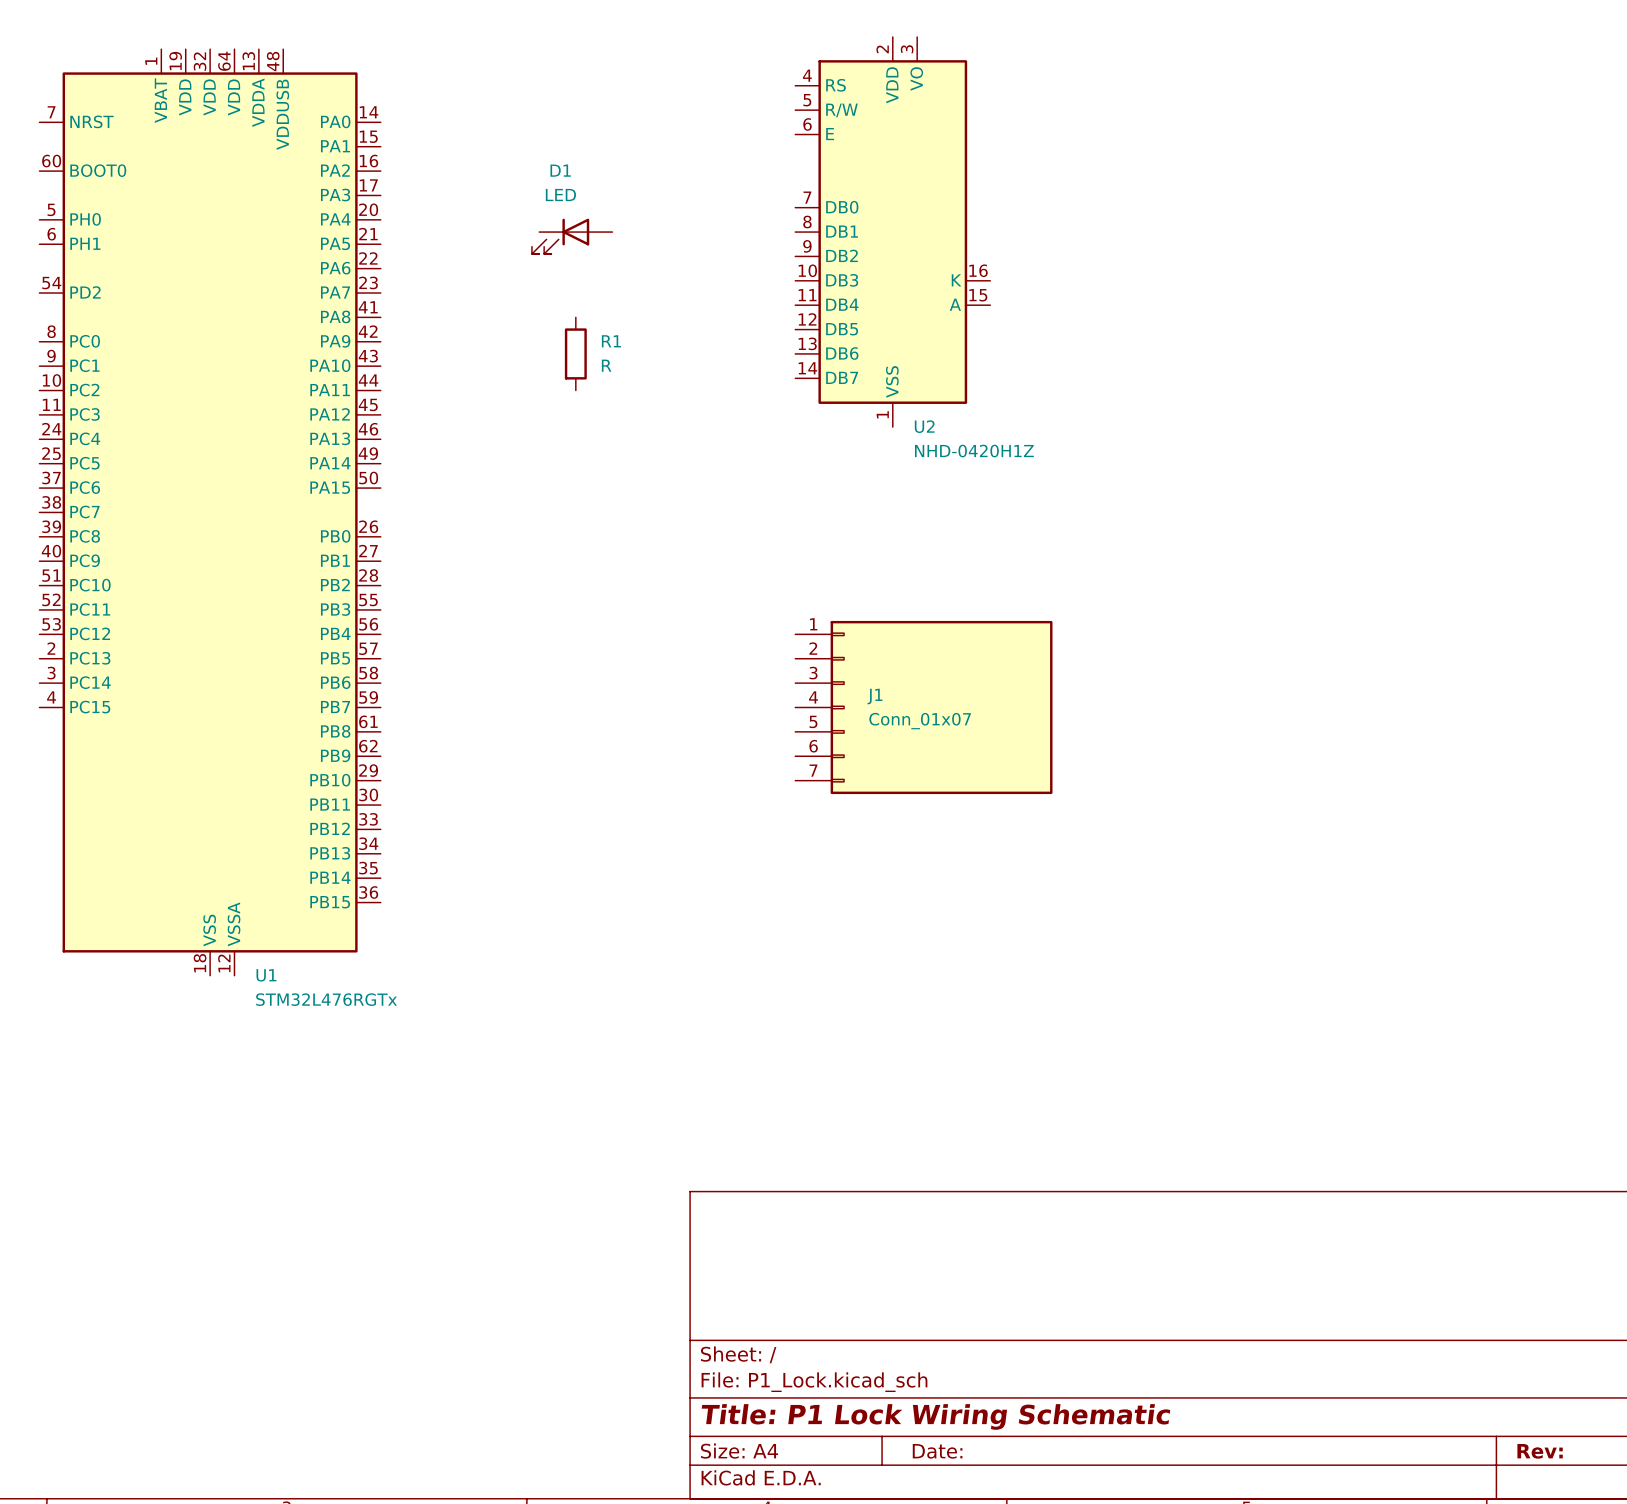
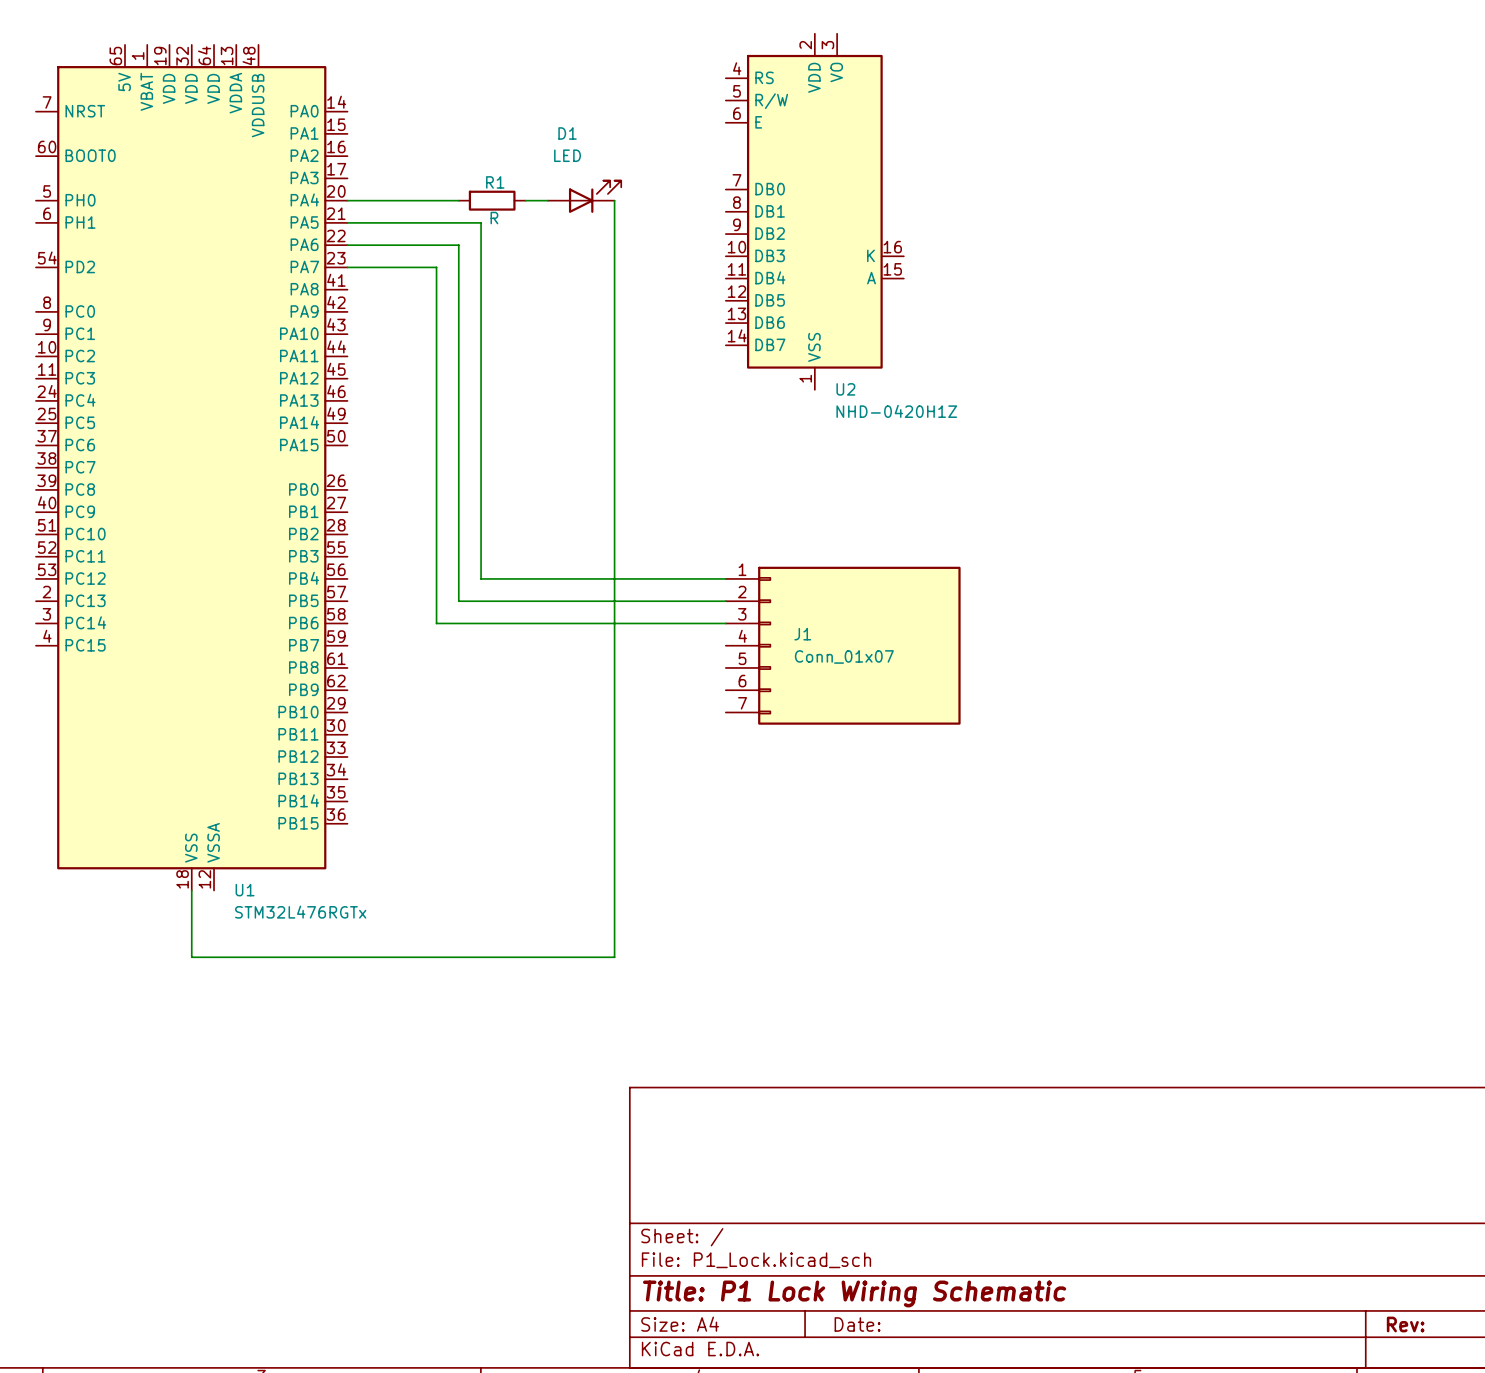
U1 symbol: [39, 49, 381, 976] -> [35, 44, 348, 891]
wire: none -> (347, 200) (458, 200)
wire: none -> (525, 200) (547, 200)
wire: none -> (614, 200) (614, 957) (191, 957) (191, 890)
D1 rotation: 0° (560, 236) -> 180° (595, 196)
D1 position: (572, 236) -> (584, 196)
wire: none -> (347, 222) (481, 222) (481, 578) (725, 578)
wire: none -> (347, 245) (458, 245) (458, 601) (725, 601)
wire: none -> (347, 267) (436, 267) (436, 623) (725, 623)
R1 name position: R1 (611, 341) -> R1 (495, 182)
R1 rotation: 0° (575, 353) -> 90° clockwise (492, 200)
R1 position: (575, 353) -> (492, 200)
R1 value position: R (606, 365) -> R (494, 218)

